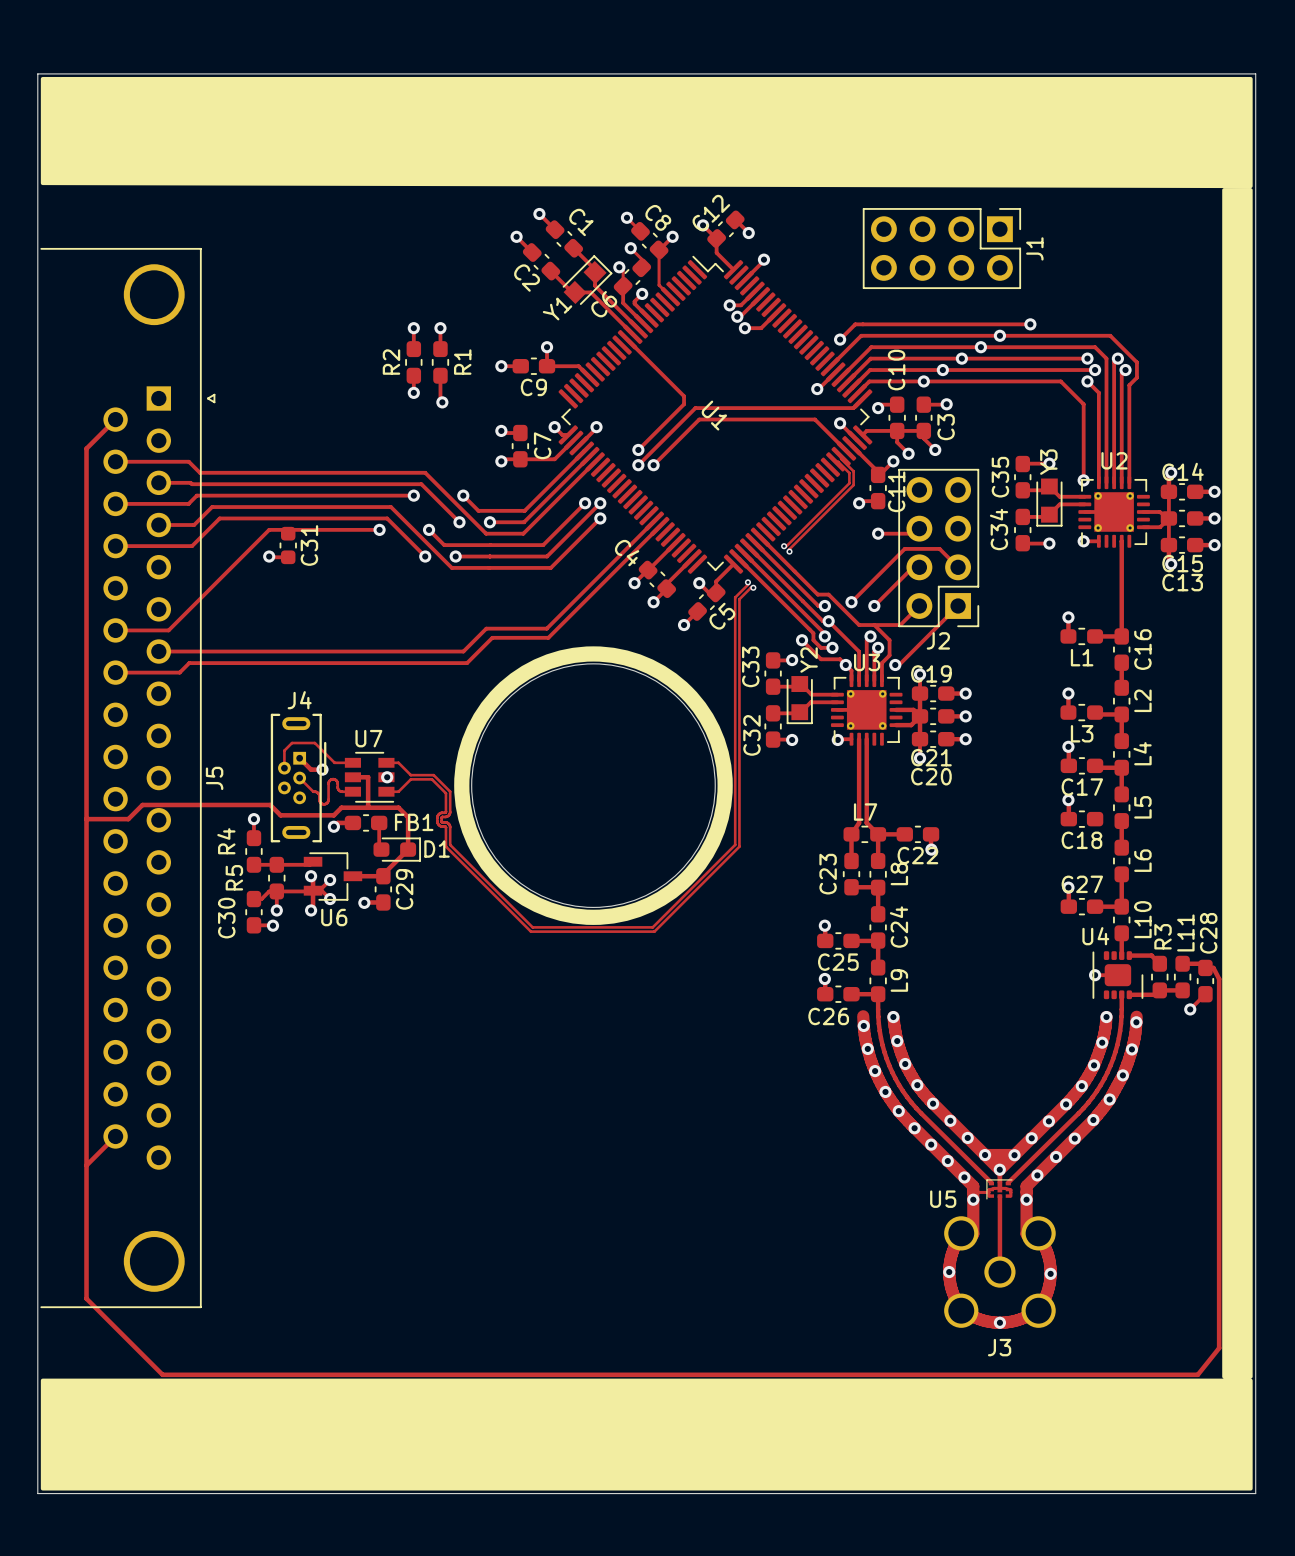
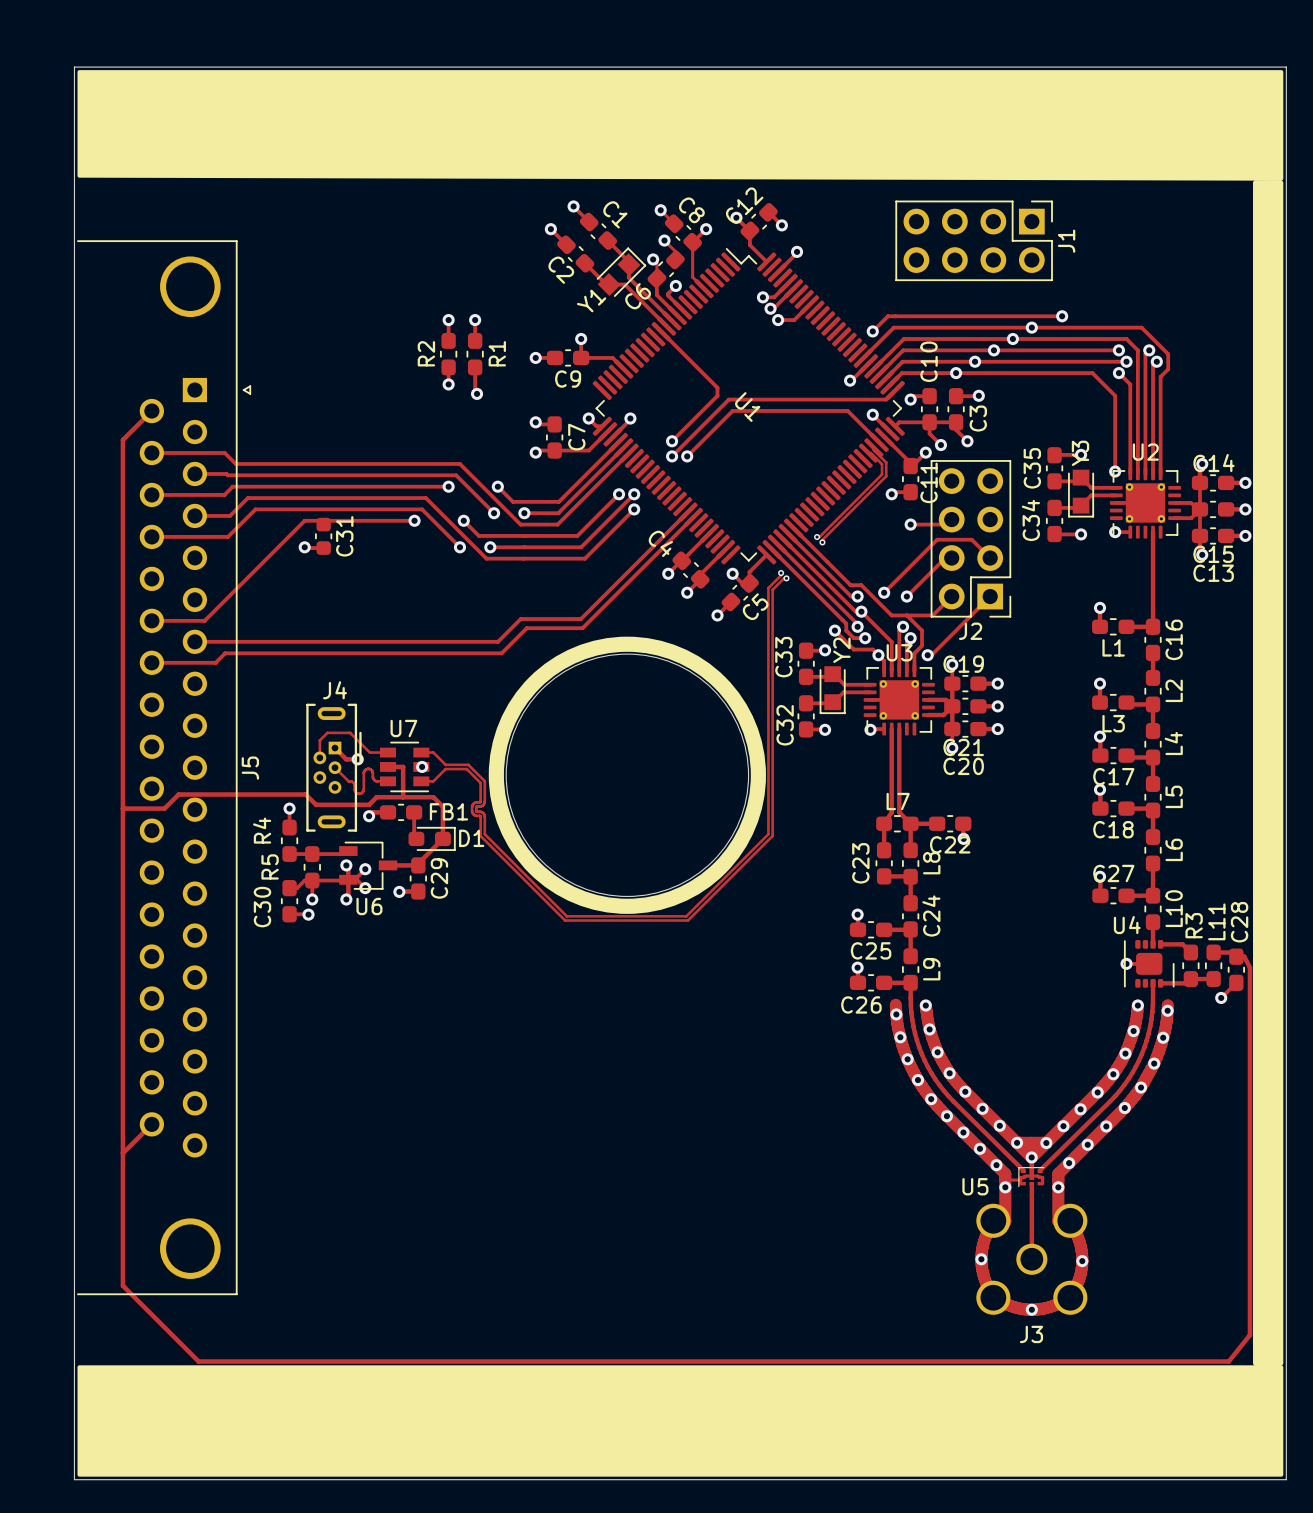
track: none -> (1126, 808) (1151, 808) (1153, 810)

